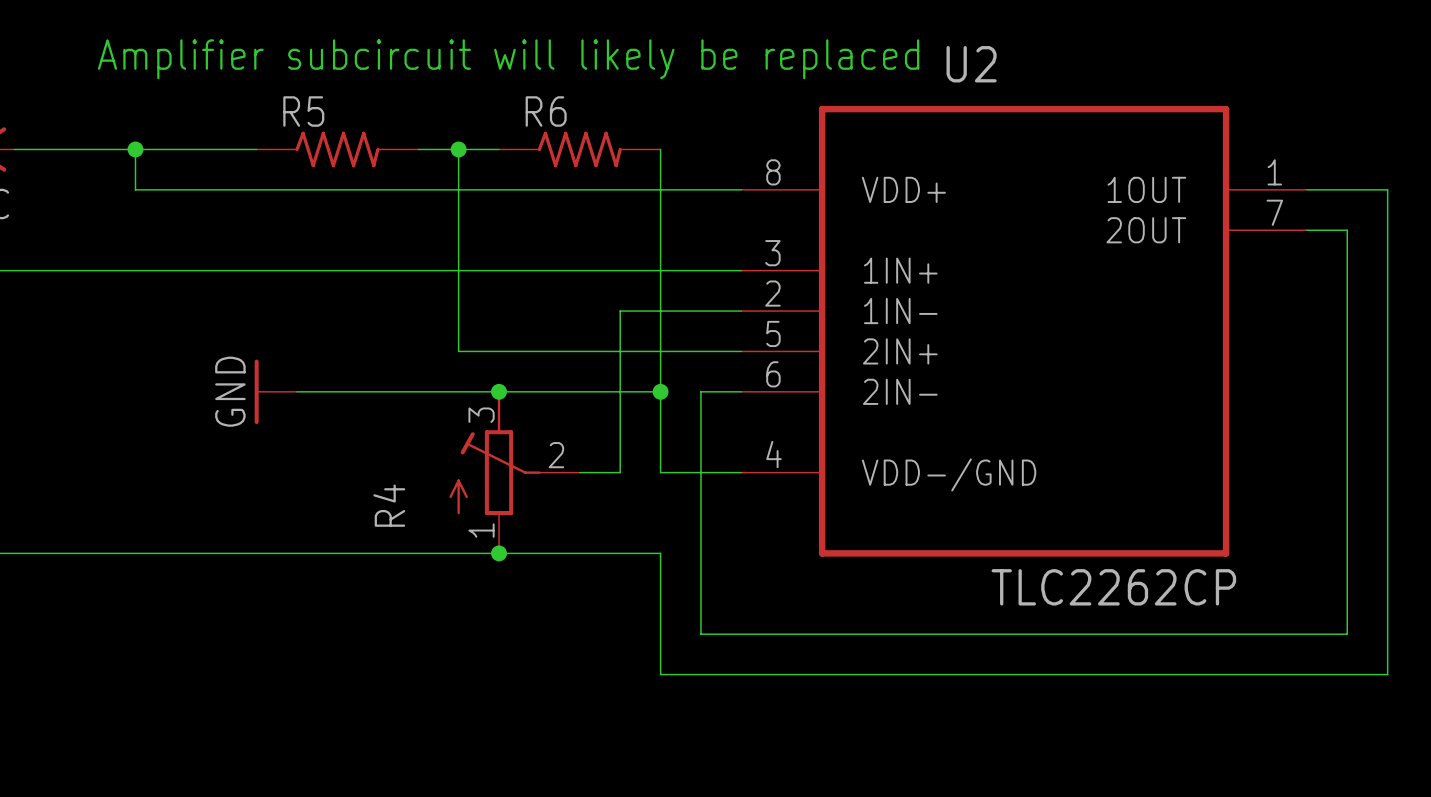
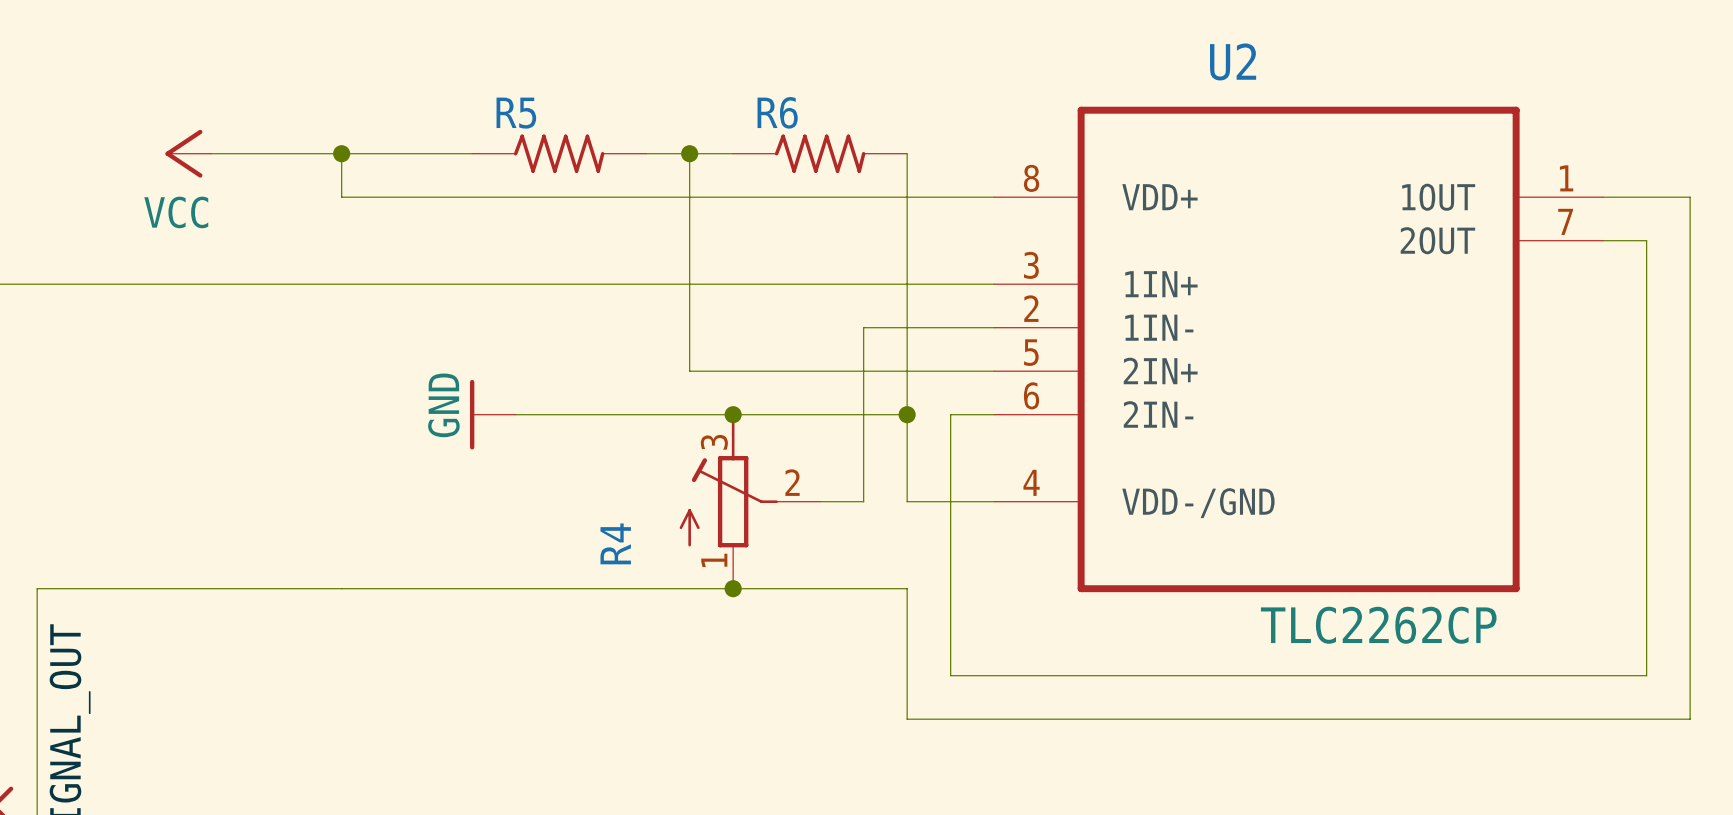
text: Amplifier subcircuit will likely be replaced (508, 59) -> none

